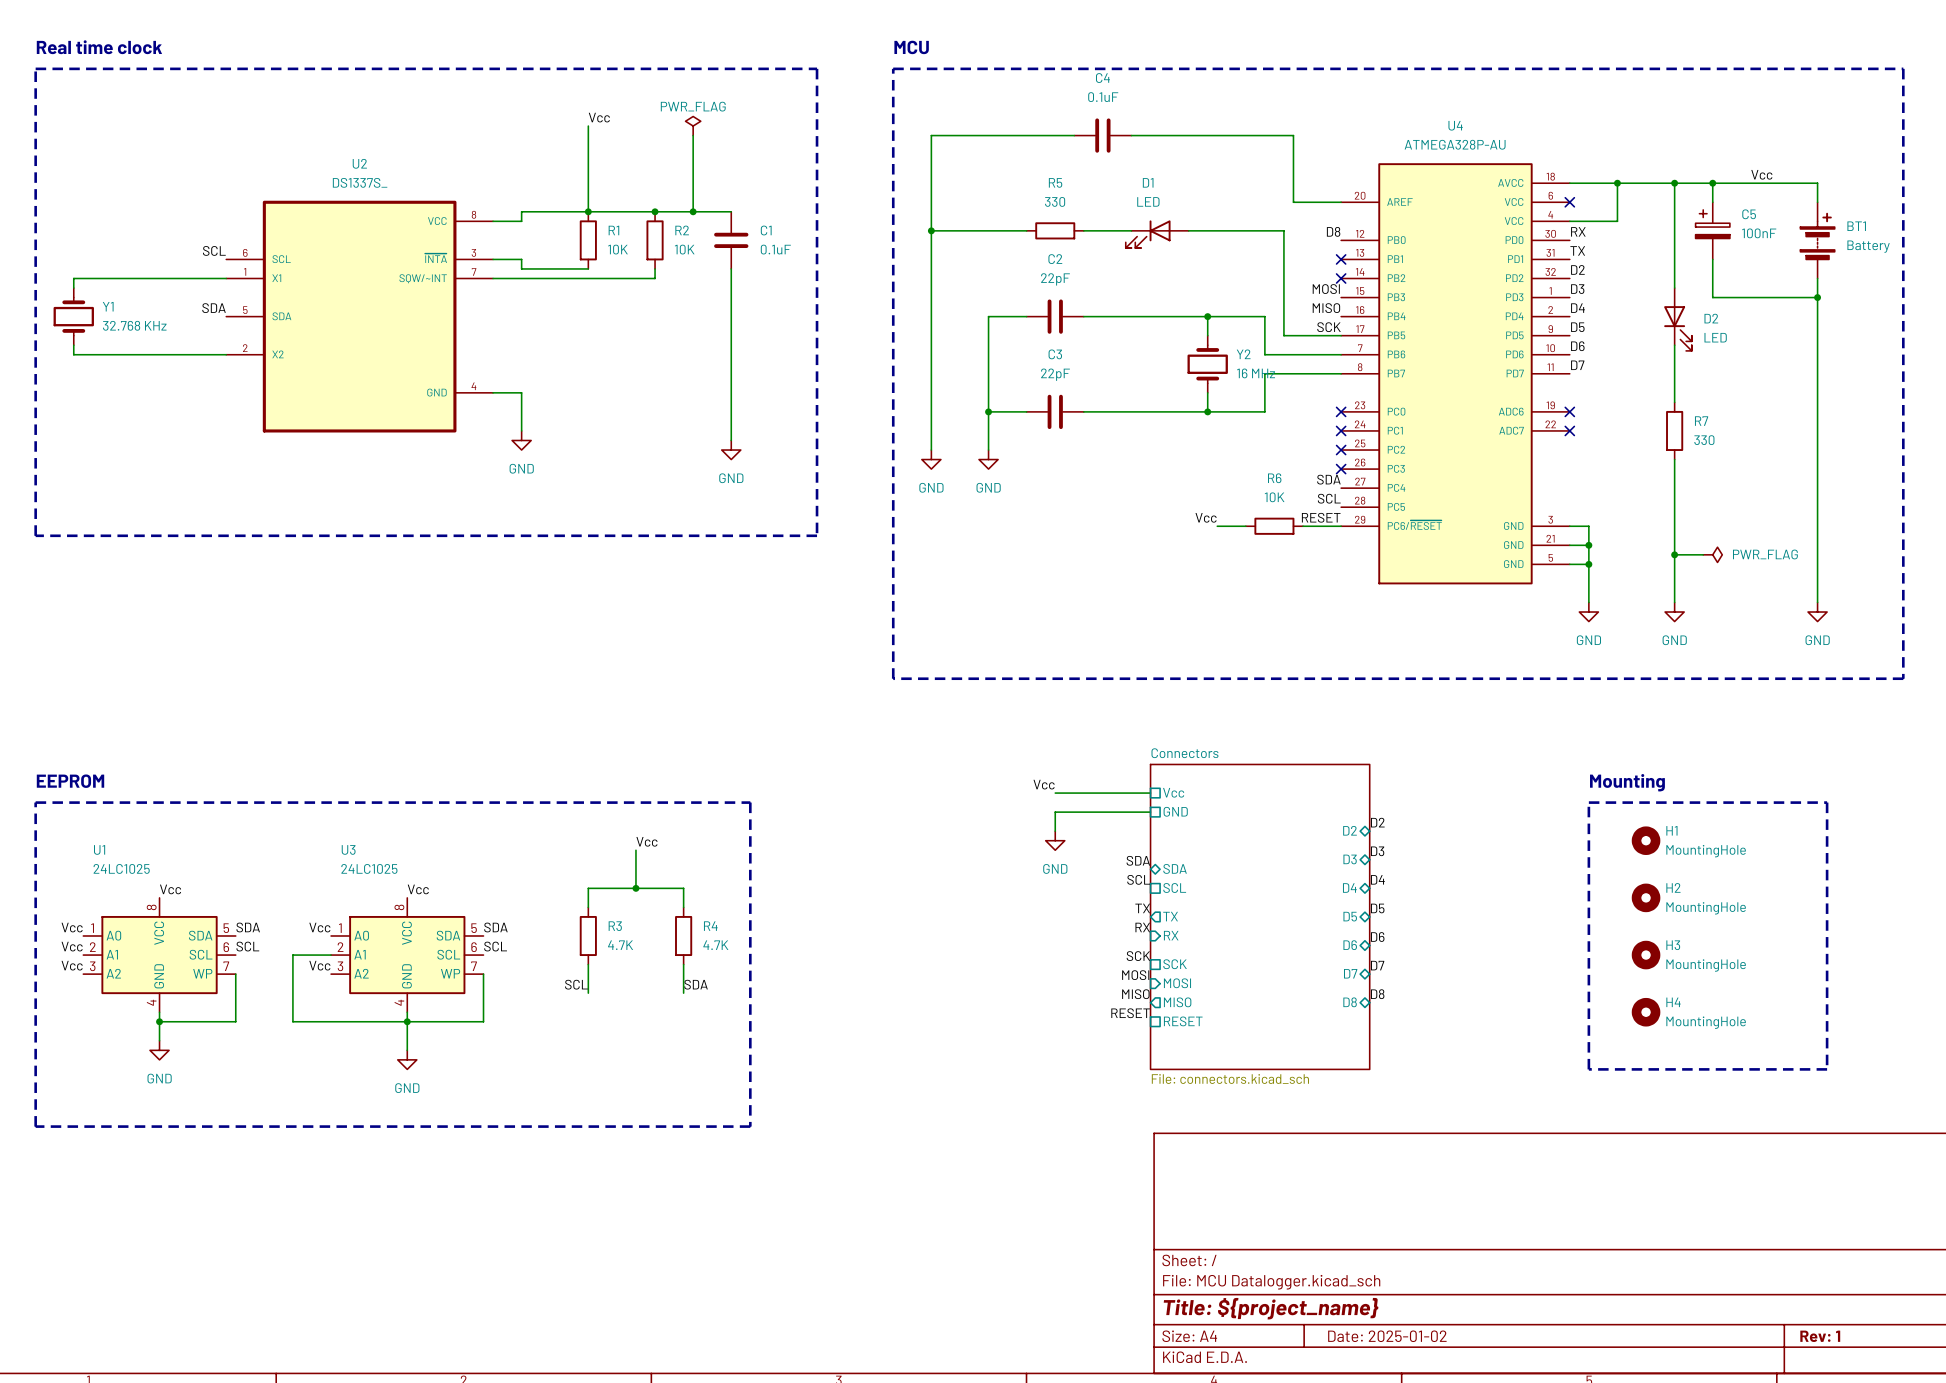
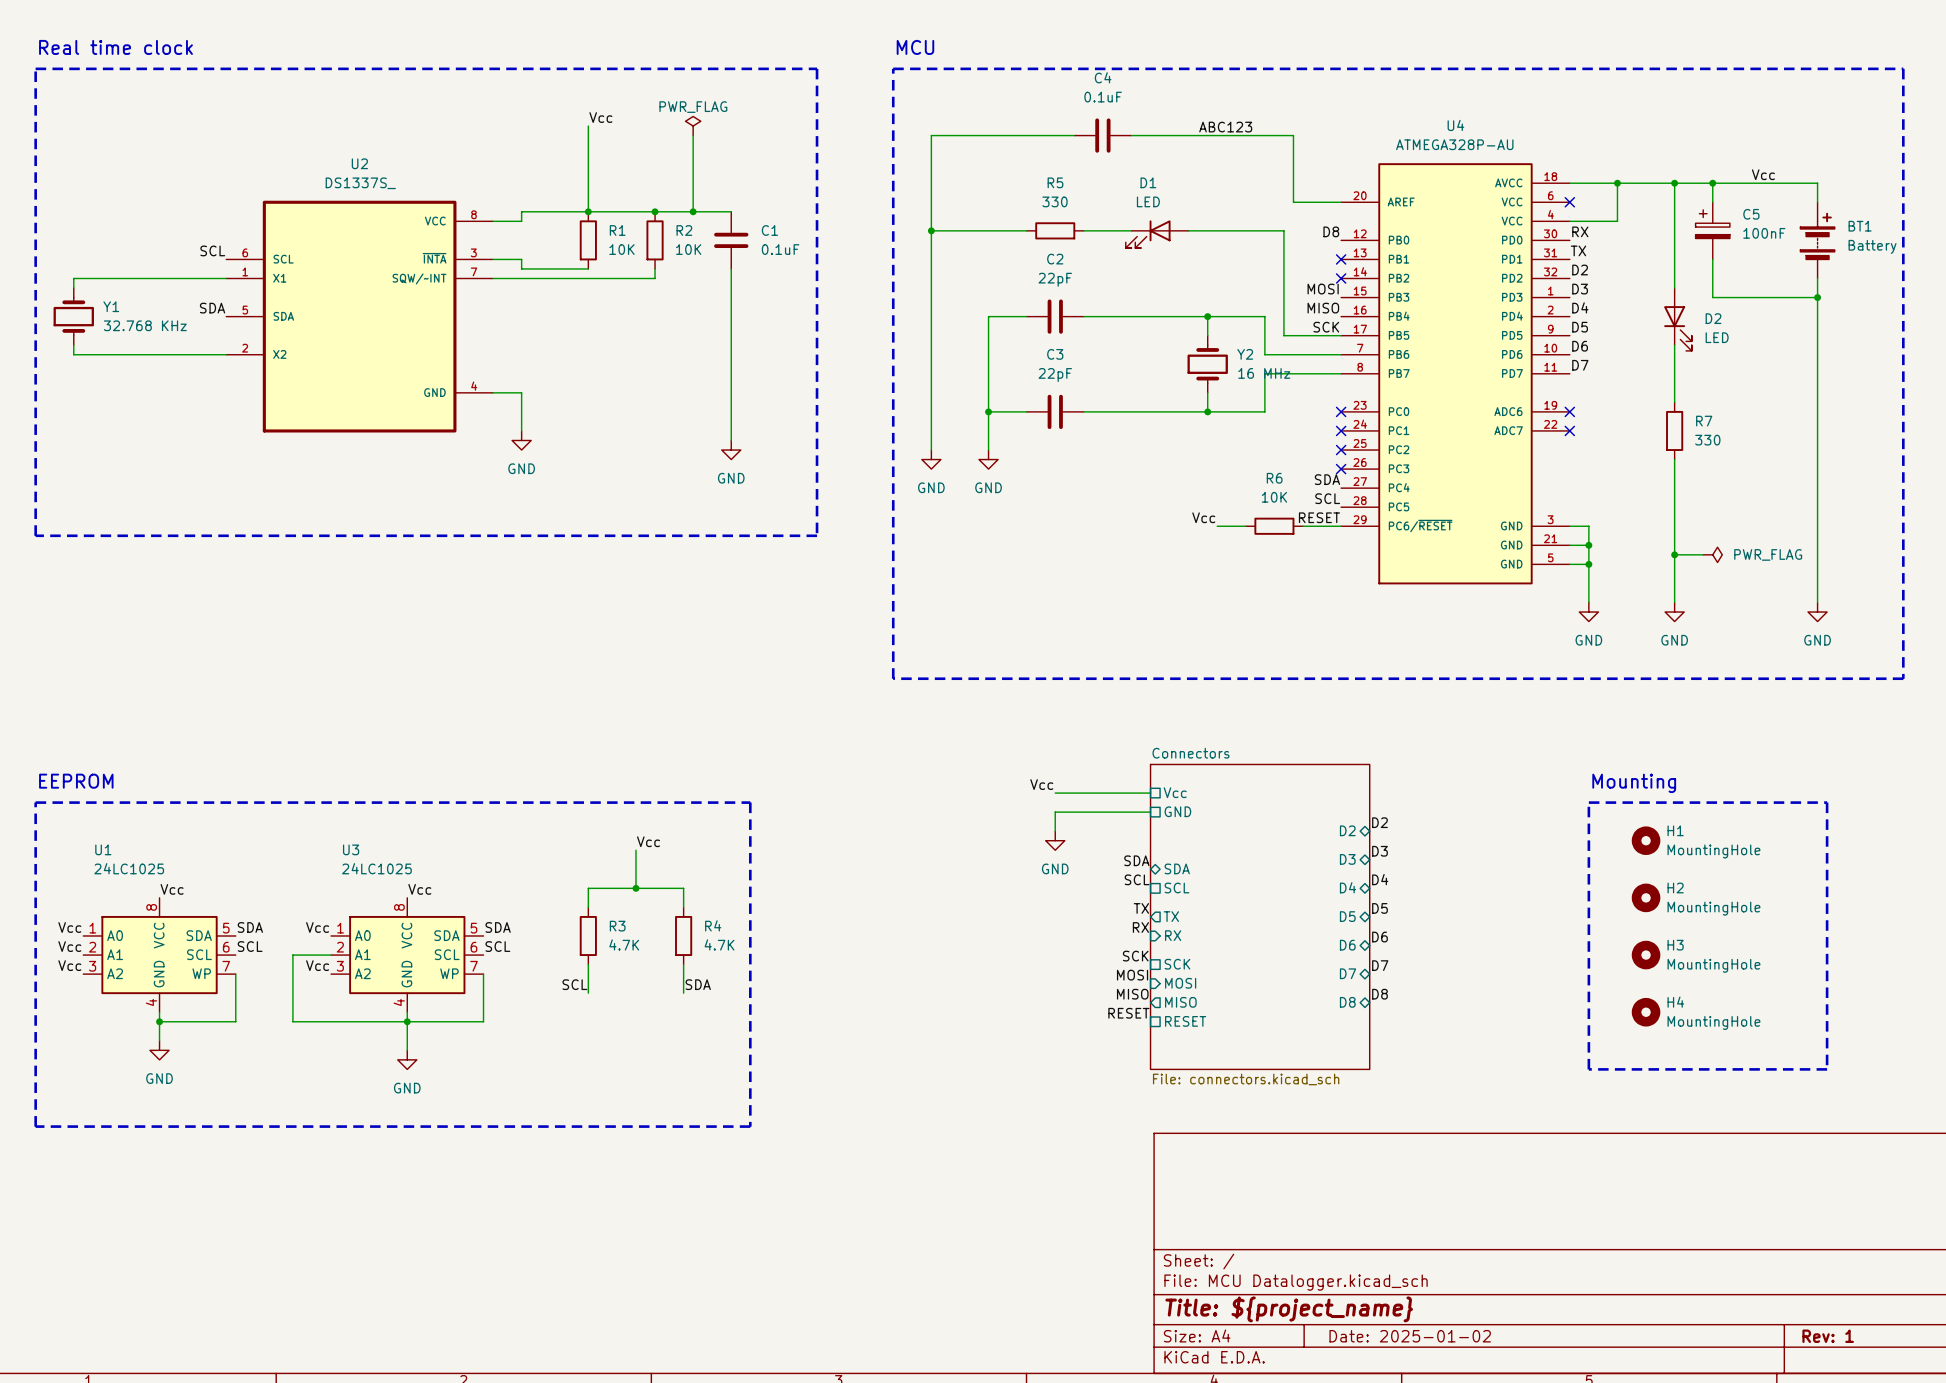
label: none -> ABC123 (1225, 127)

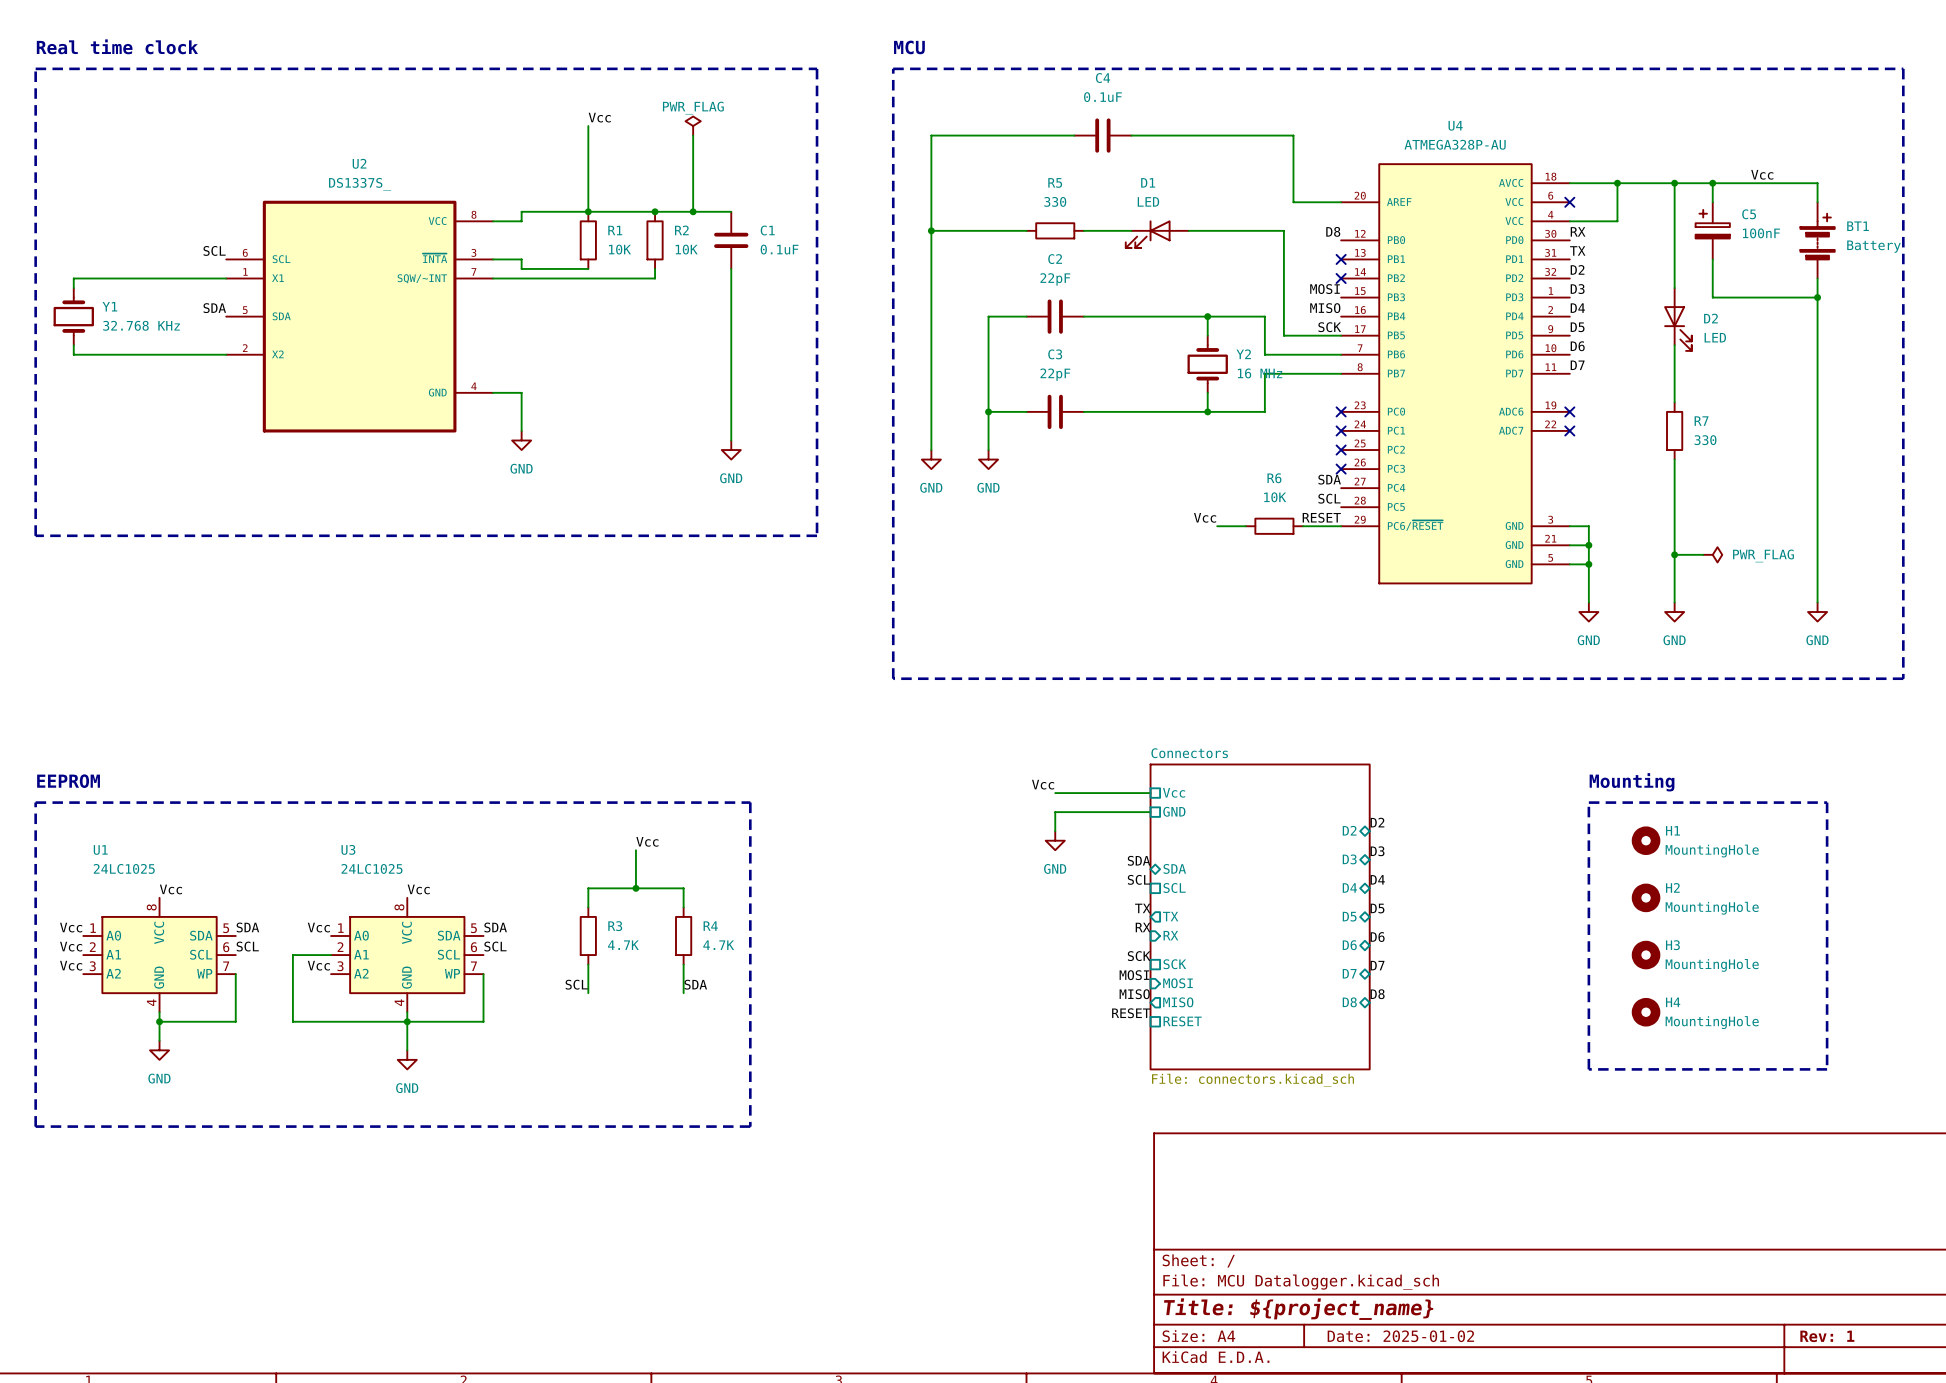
label: ABC123 (1225, 127) -> none

